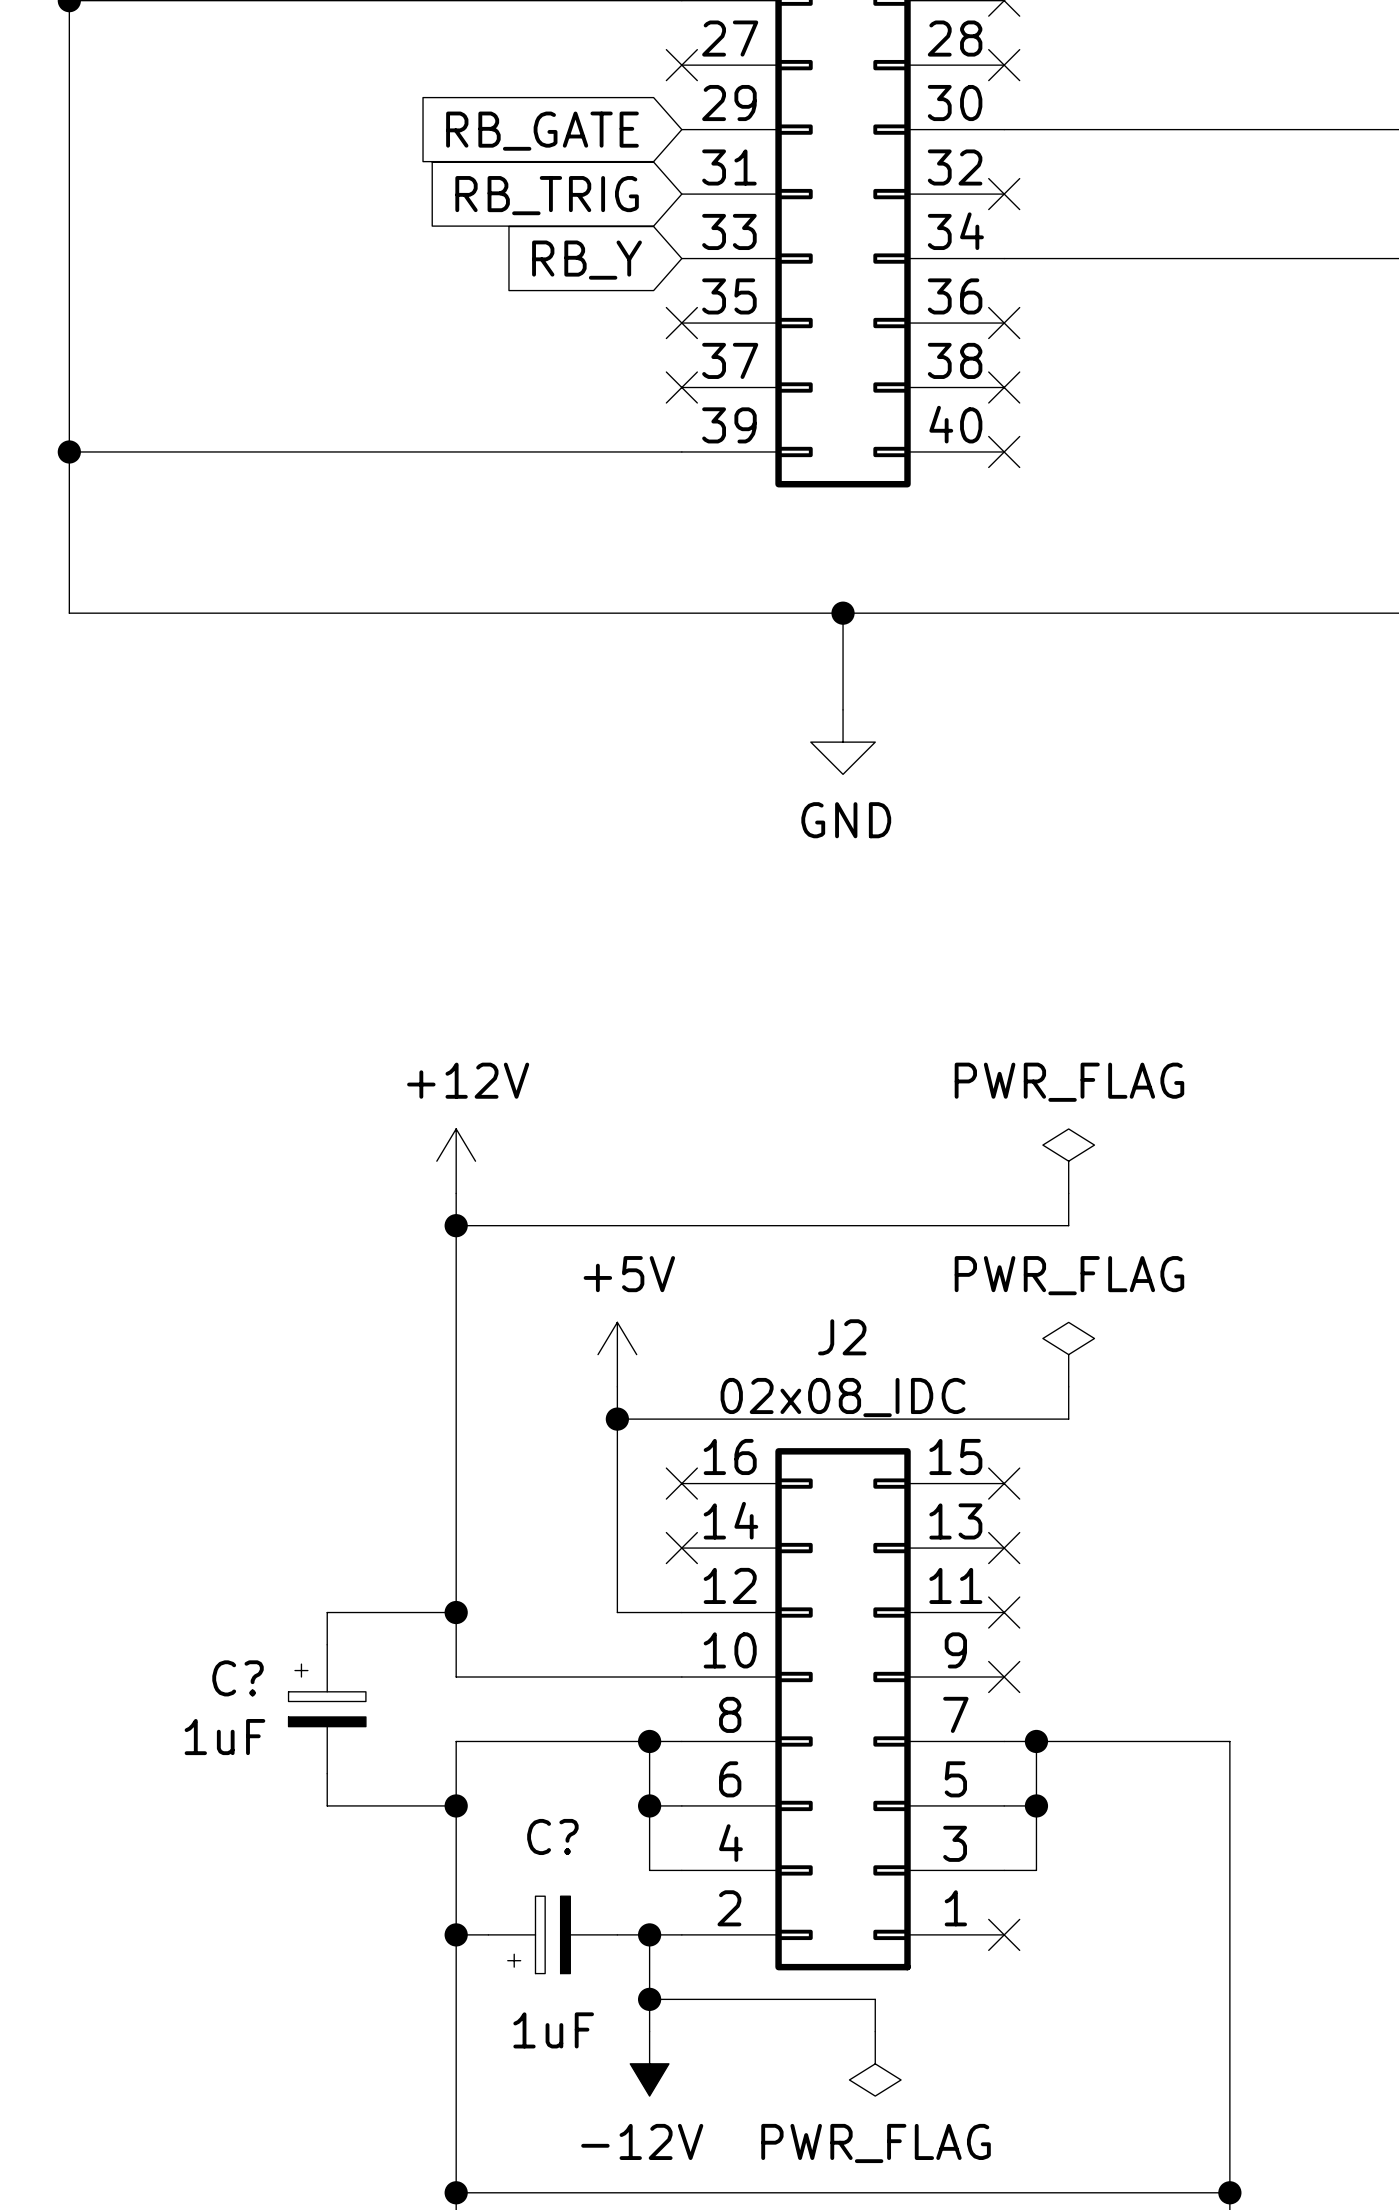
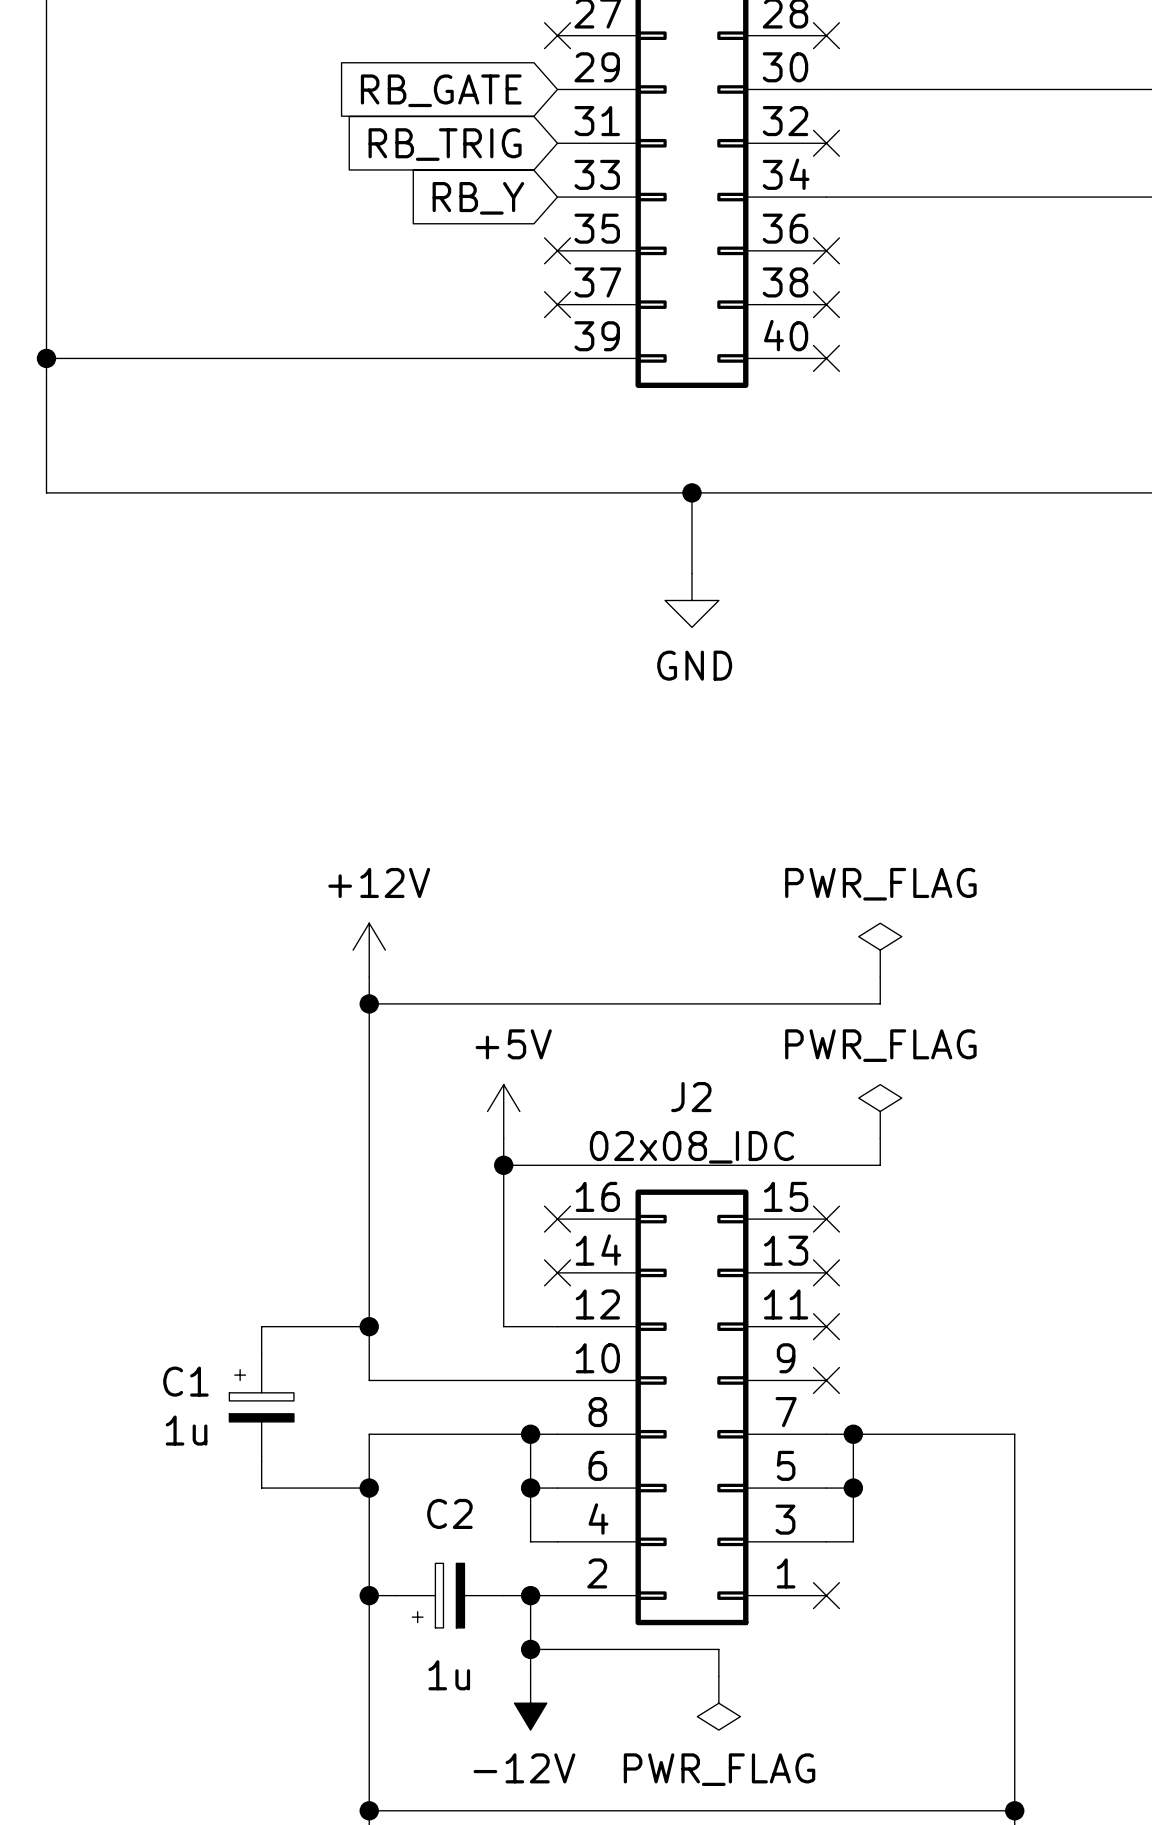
C? name: C? (238, 1678) -> C1 (185, 1381)
C? value: 1uF (224, 1737) -> 1u (186, 1430)
C? name: C? (552, 1836) -> C2 (449, 1513)
C? value: 1uF (553, 2030) -> 1u (449, 1675)

